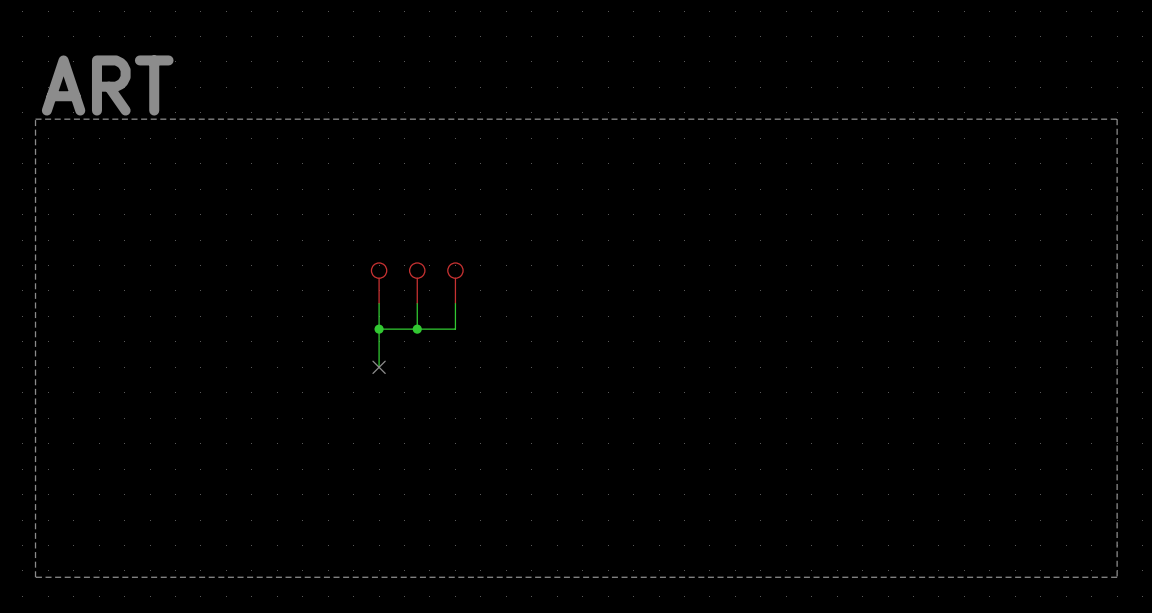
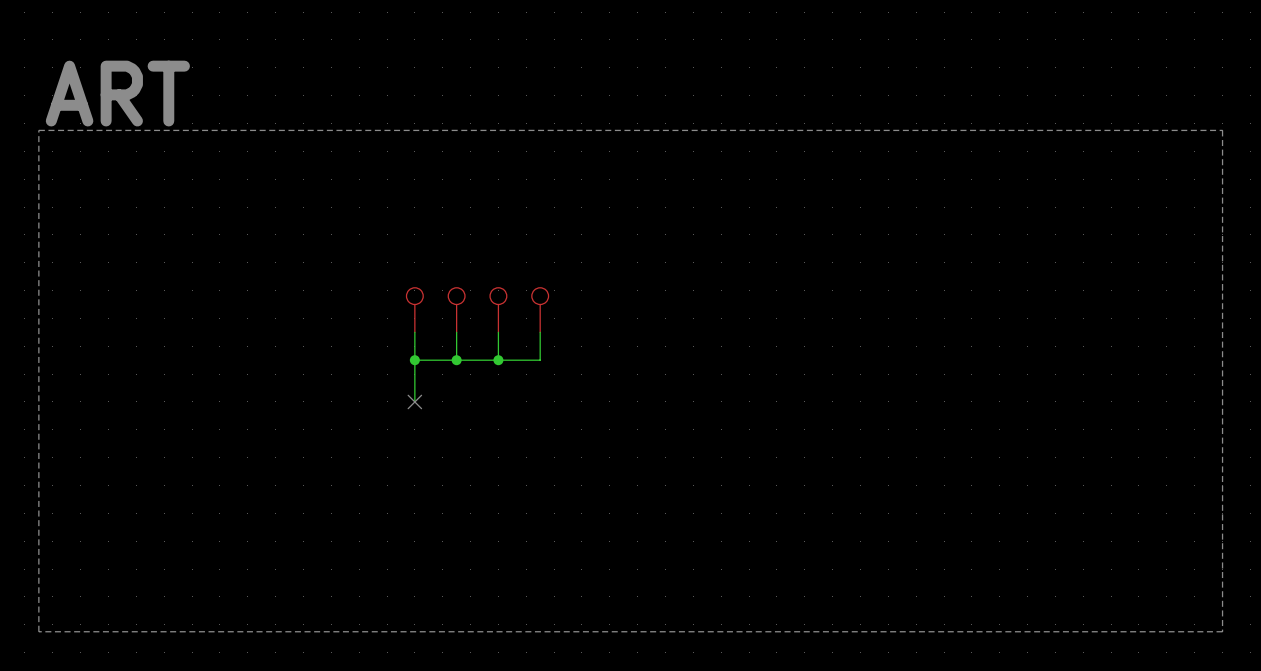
part: none -> (540, 310)
wire: none -> (540, 332) (540, 360) (498, 360)
junction: none -> (498, 360)

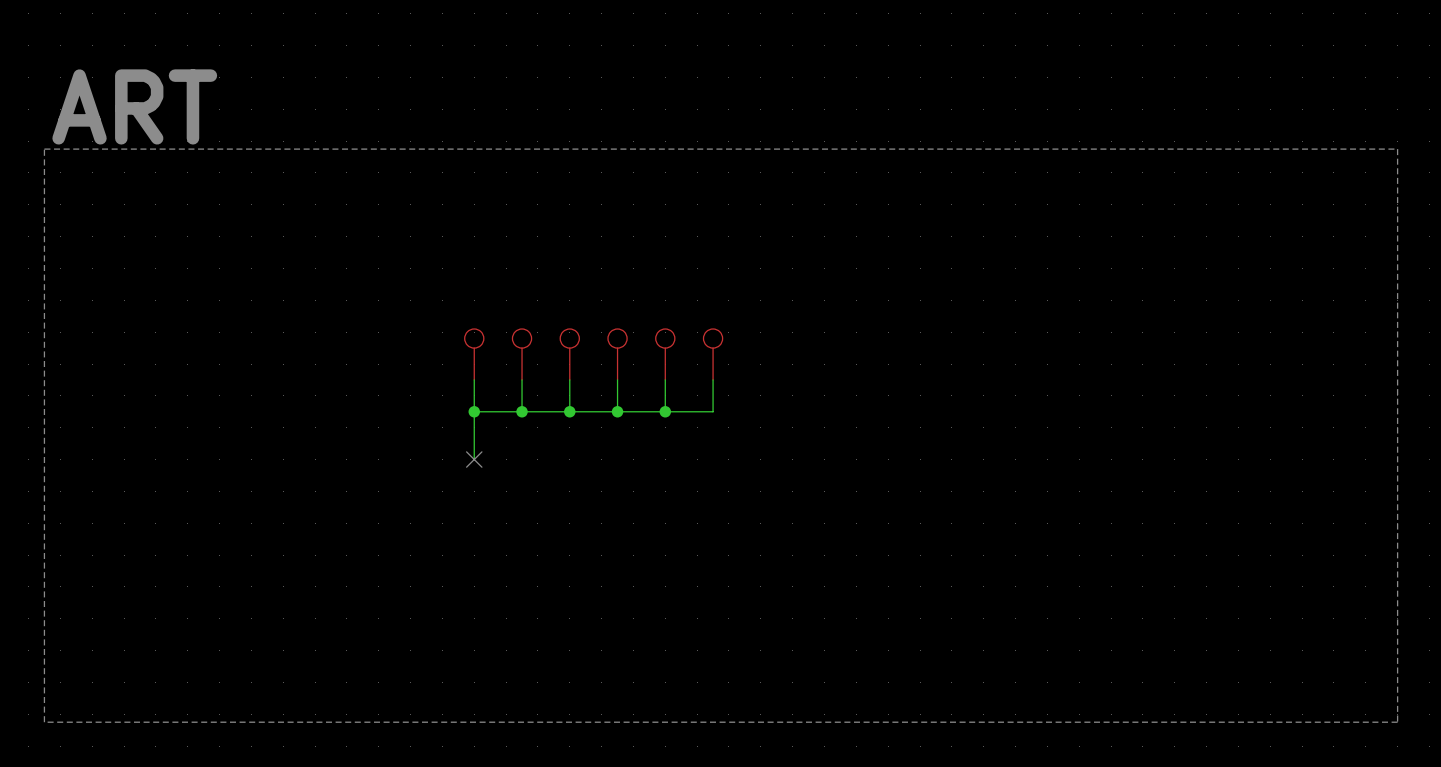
part: none -> (665, 354)
part: none -> (713, 354)
wire: none -> (665, 379) (665, 411)
wire: none -> (713, 379) (713, 411) (617, 411)
junction: none -> (617, 411)
junction: none -> (665, 411)

